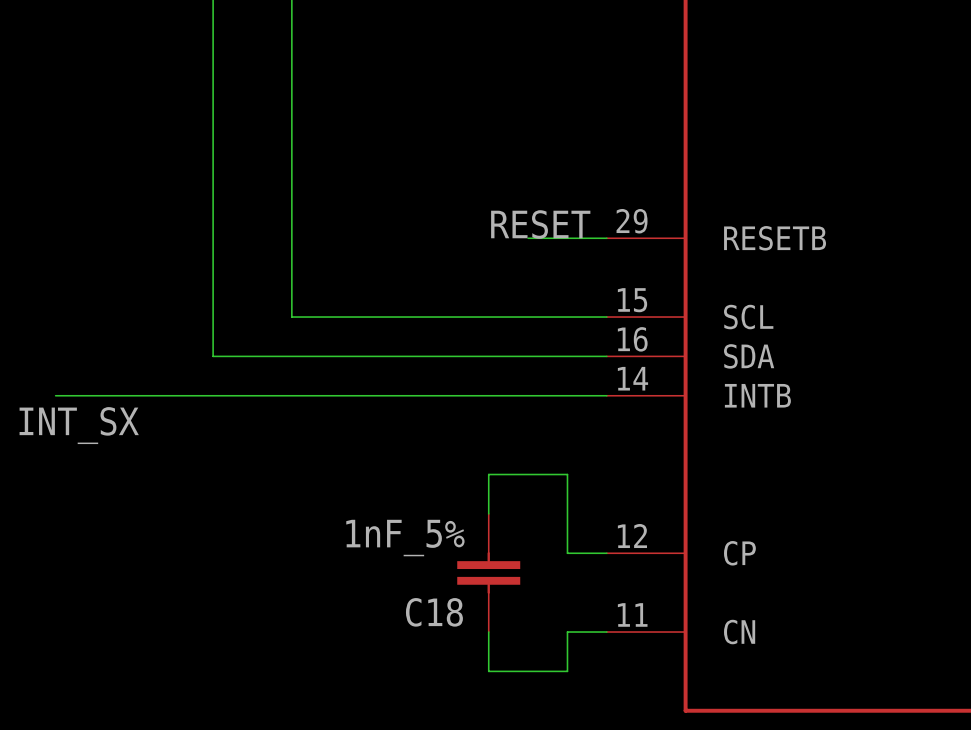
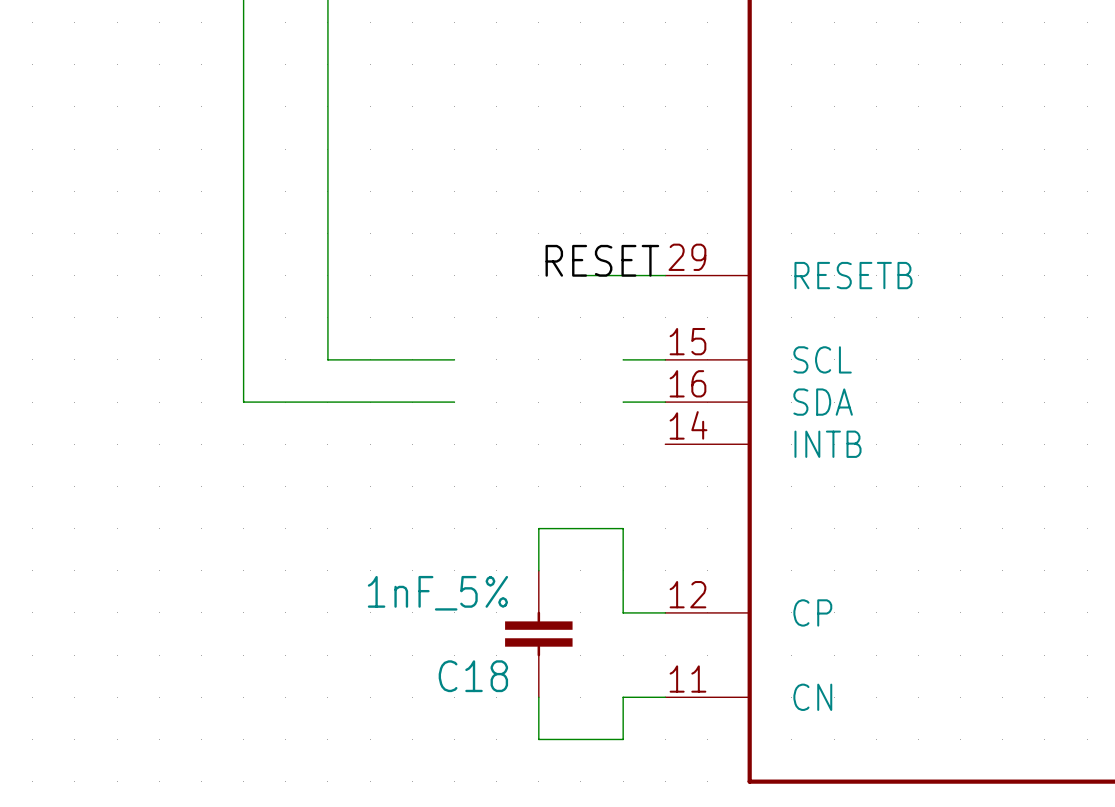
wire: (409, 317) (567, 317) -> none
wire: (409, 356) (567, 356) -> none
wire: (55, 395) (606, 395) -> none
label: INT_SX (79, 425) -> none

